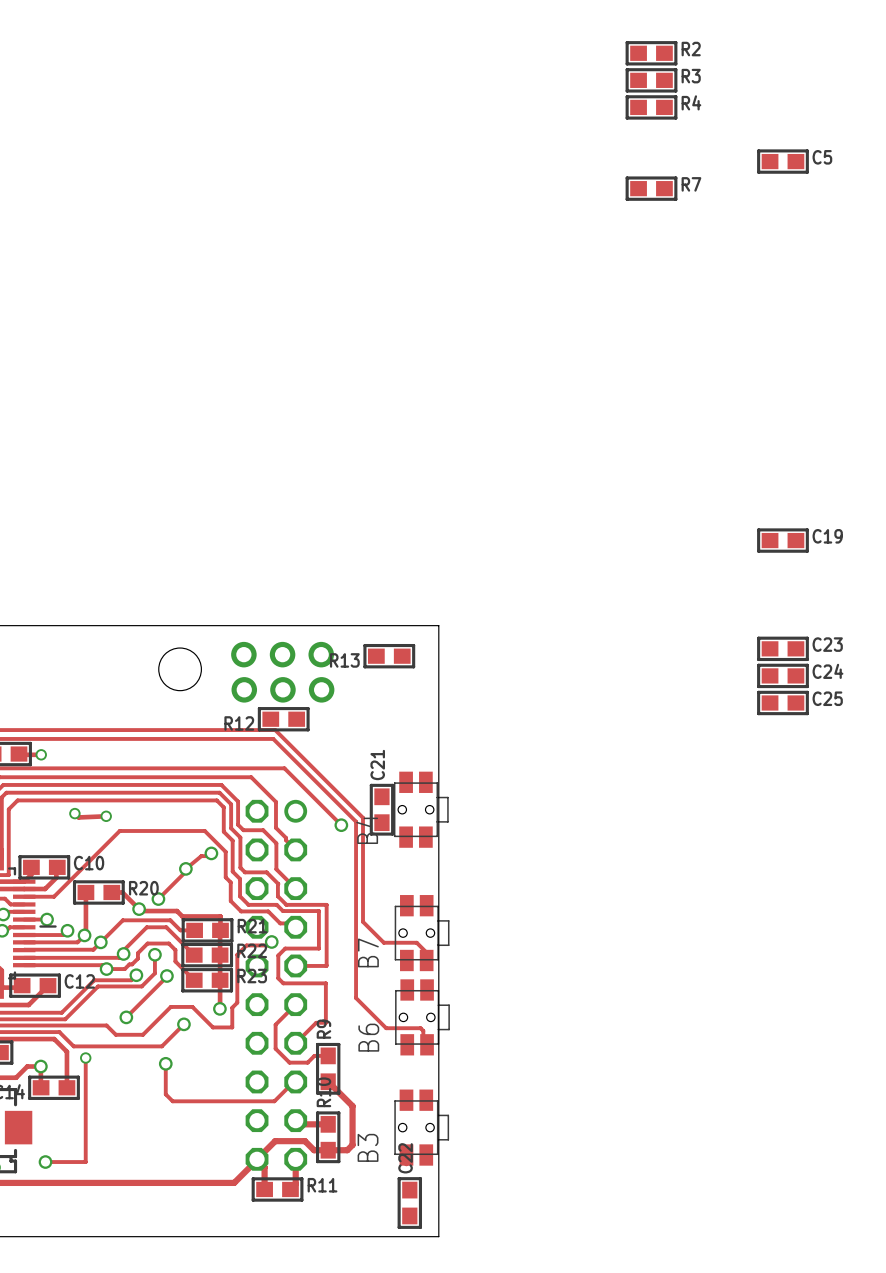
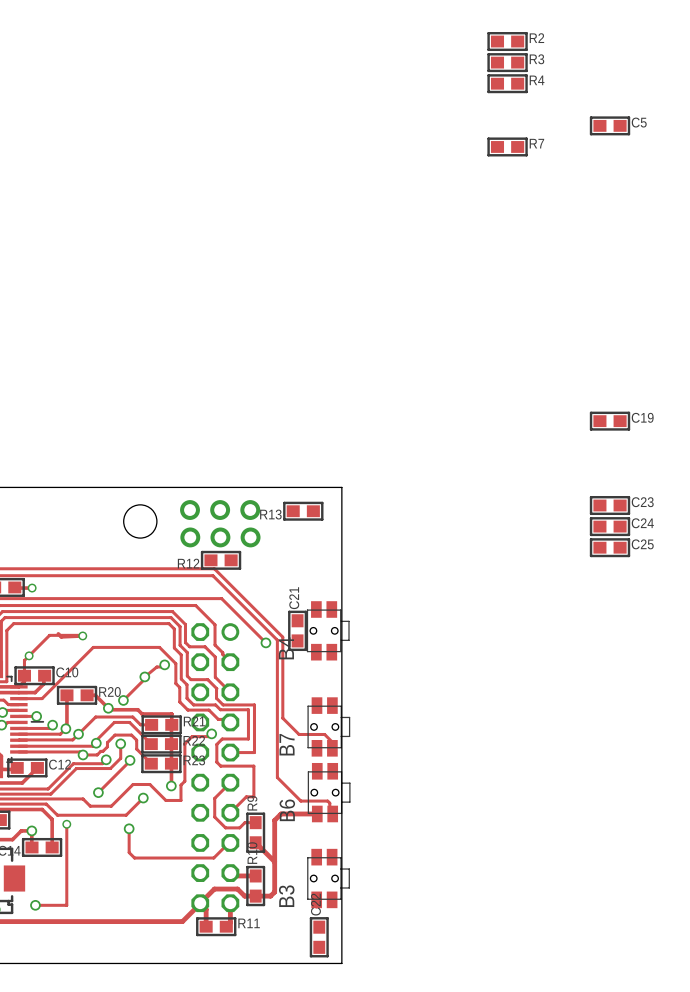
via position: (74, 813) -> (29, 655)
track: none -> (80, 635) (49, 635) (24, 660) (24, 675)
track: none -> (317, 813) (281, 813) (274, 820) (274, 861)

